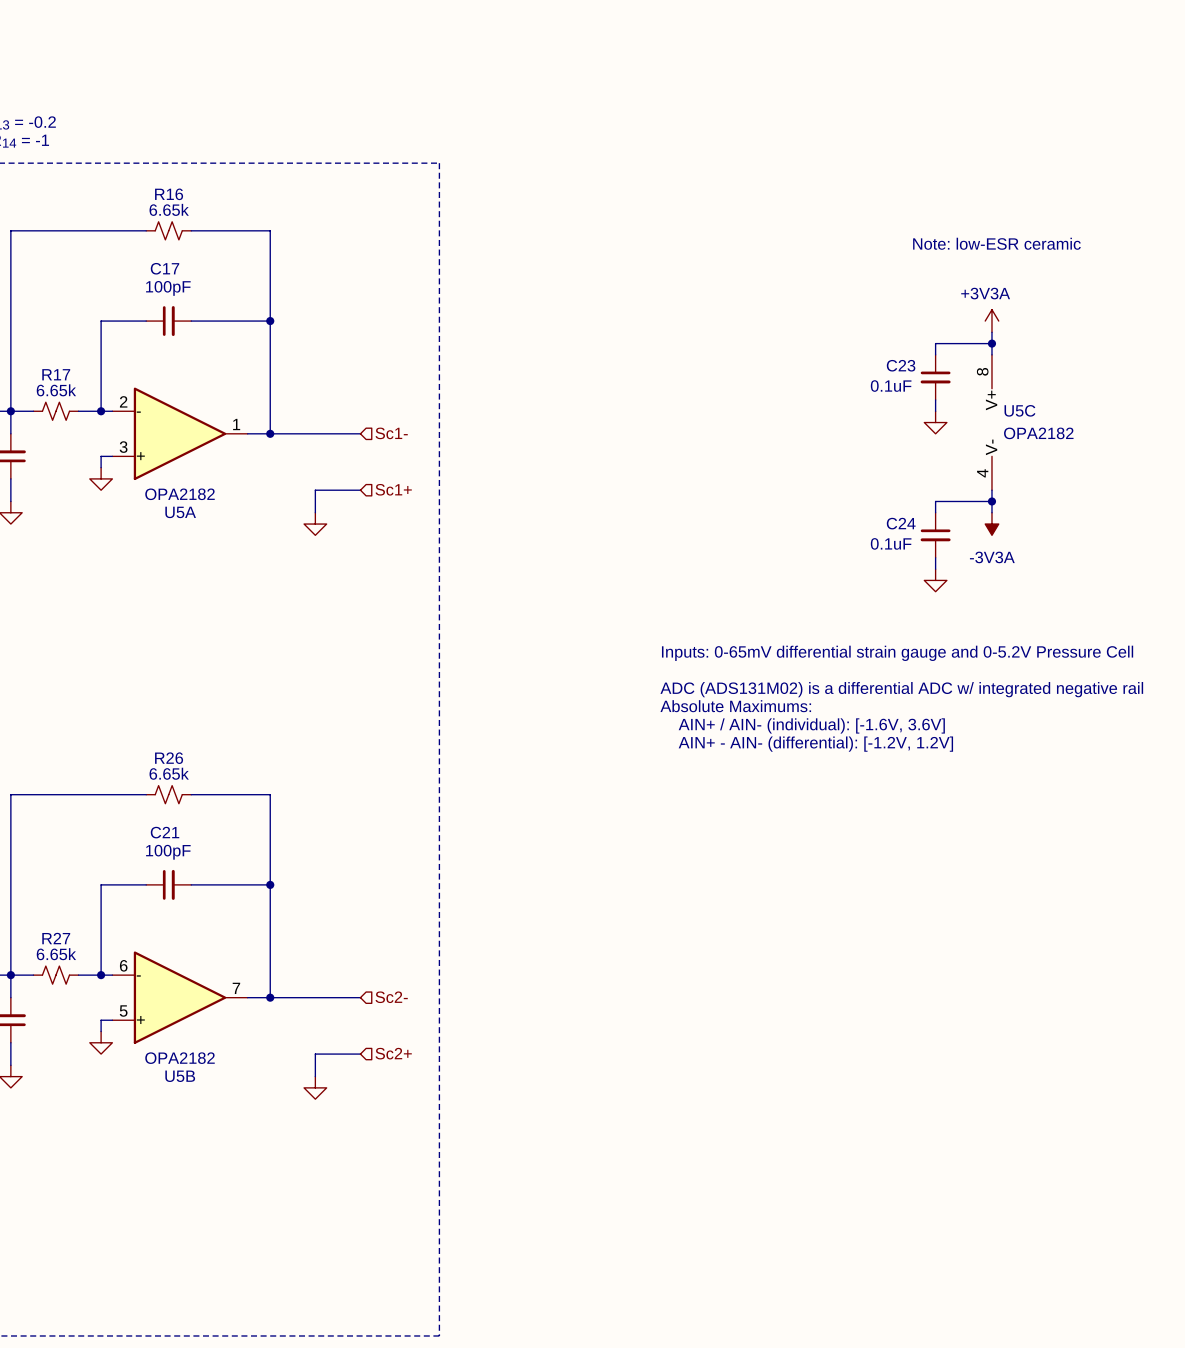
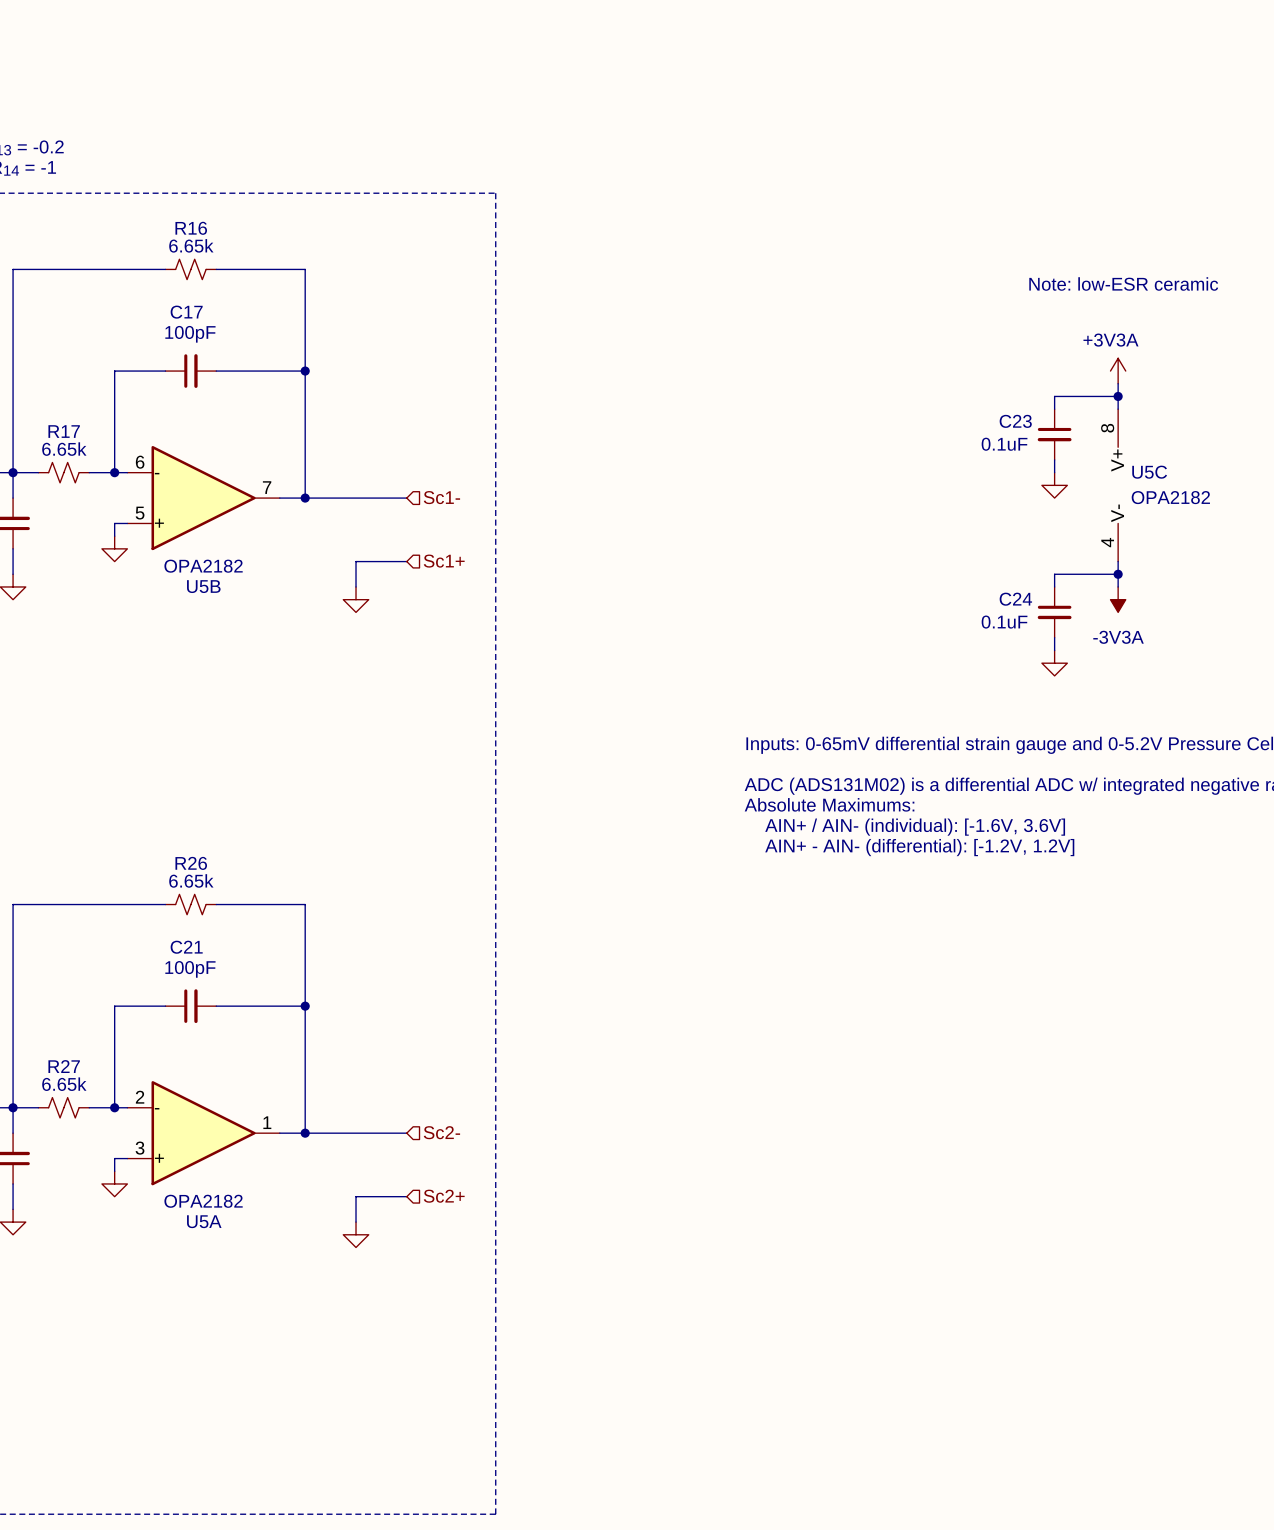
U5A position: (180, 433) -> (203, 1133)
U5B position: (180, 997) -> (203, 498)

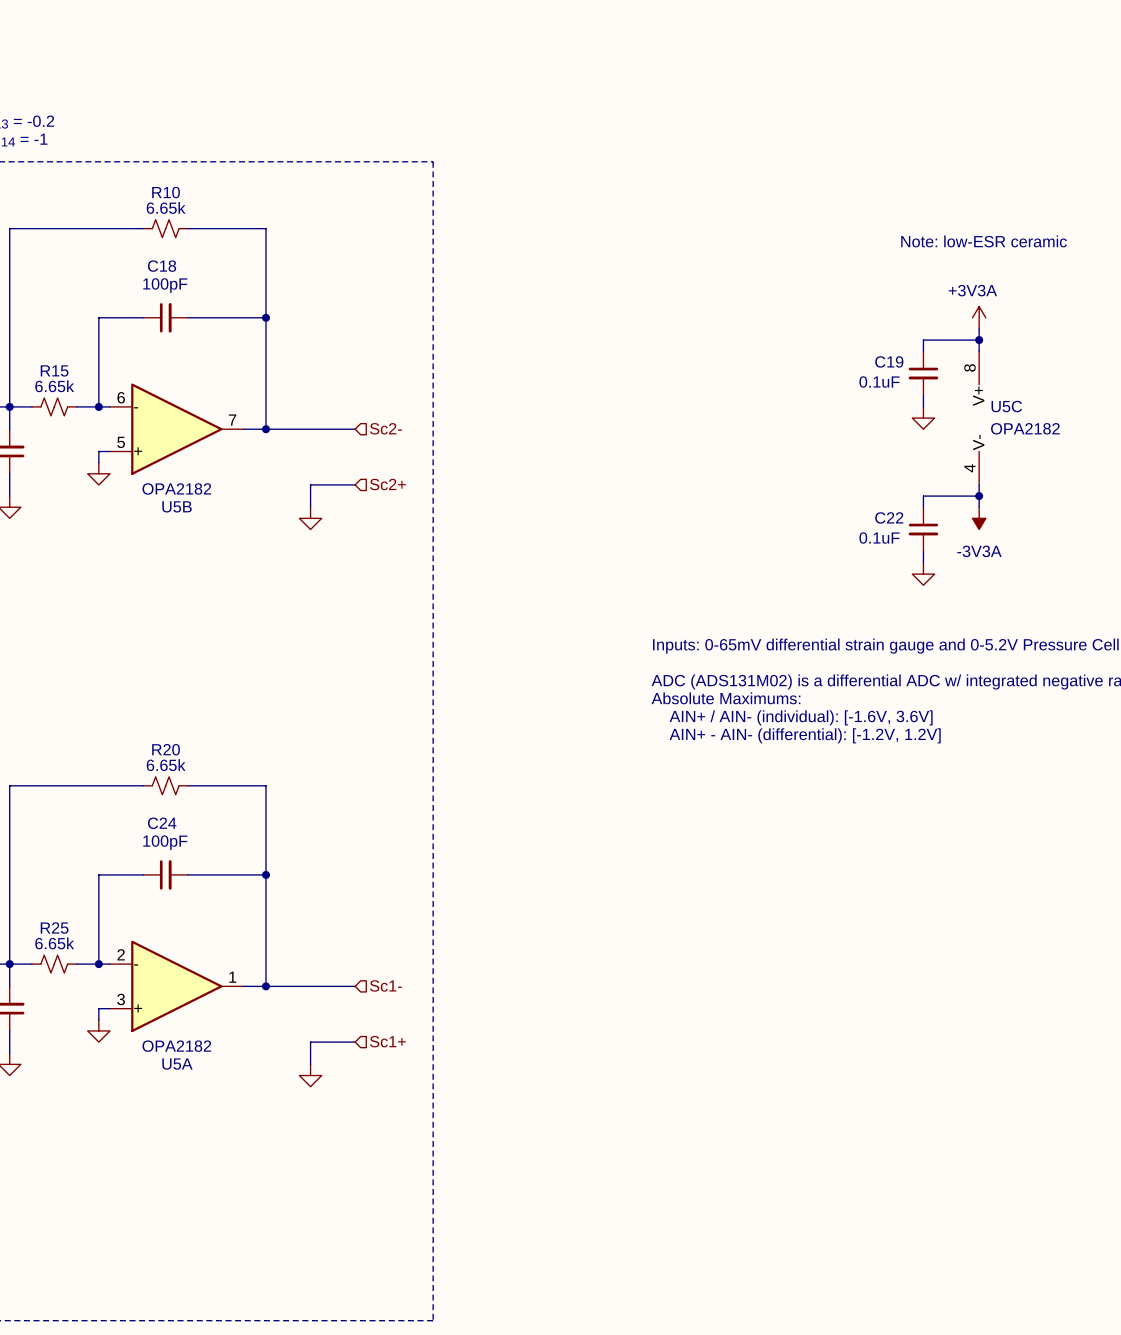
R16 name: R16 (191, 228) -> R10 (166, 192)
C17 name: C17 (186, 312) -> C18 (162, 266)
C23 name: C23 (1015, 421) -> C19 (889, 361)
R17 name: R17 (64, 431) -> R15 (54, 370)
hierarchical label: Sc1- (441, 497) -> Sc2- (385, 428)
hierarchical label: Sc1+ (444, 561) -> Sc2+ (387, 484)
C24 name: C24 (1015, 599) -> C22 (889, 517)
R26 name: R26 (191, 863) -> R20 (166, 749)
C21 name: C21 (186, 947) -> C24 (162, 823)
R27 name: R27 (64, 1066) -> R25 (54, 928)
hierarchical label: Sc2- (441, 1132) -> Sc1- (385, 985)
hierarchical label: Sc2+ (444, 1196) -> Sc1+ (387, 1041)

